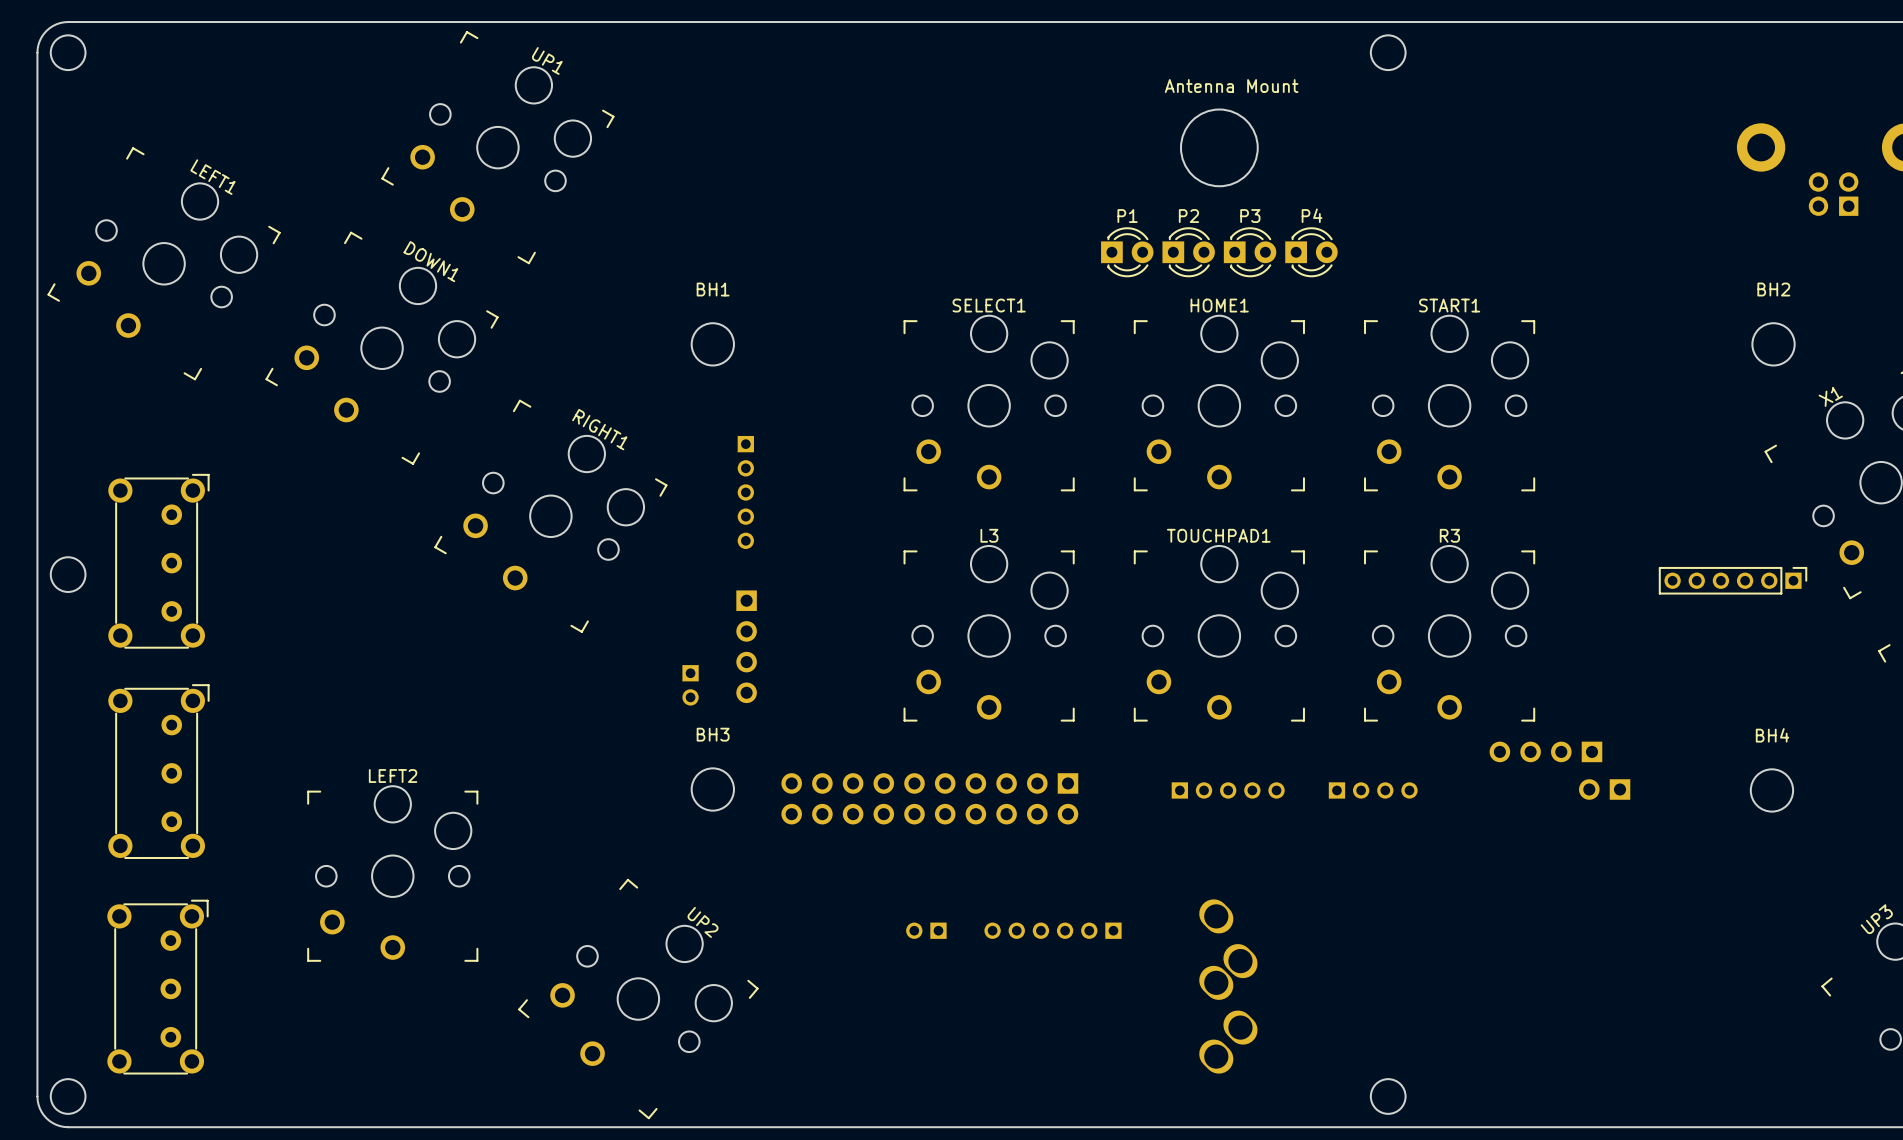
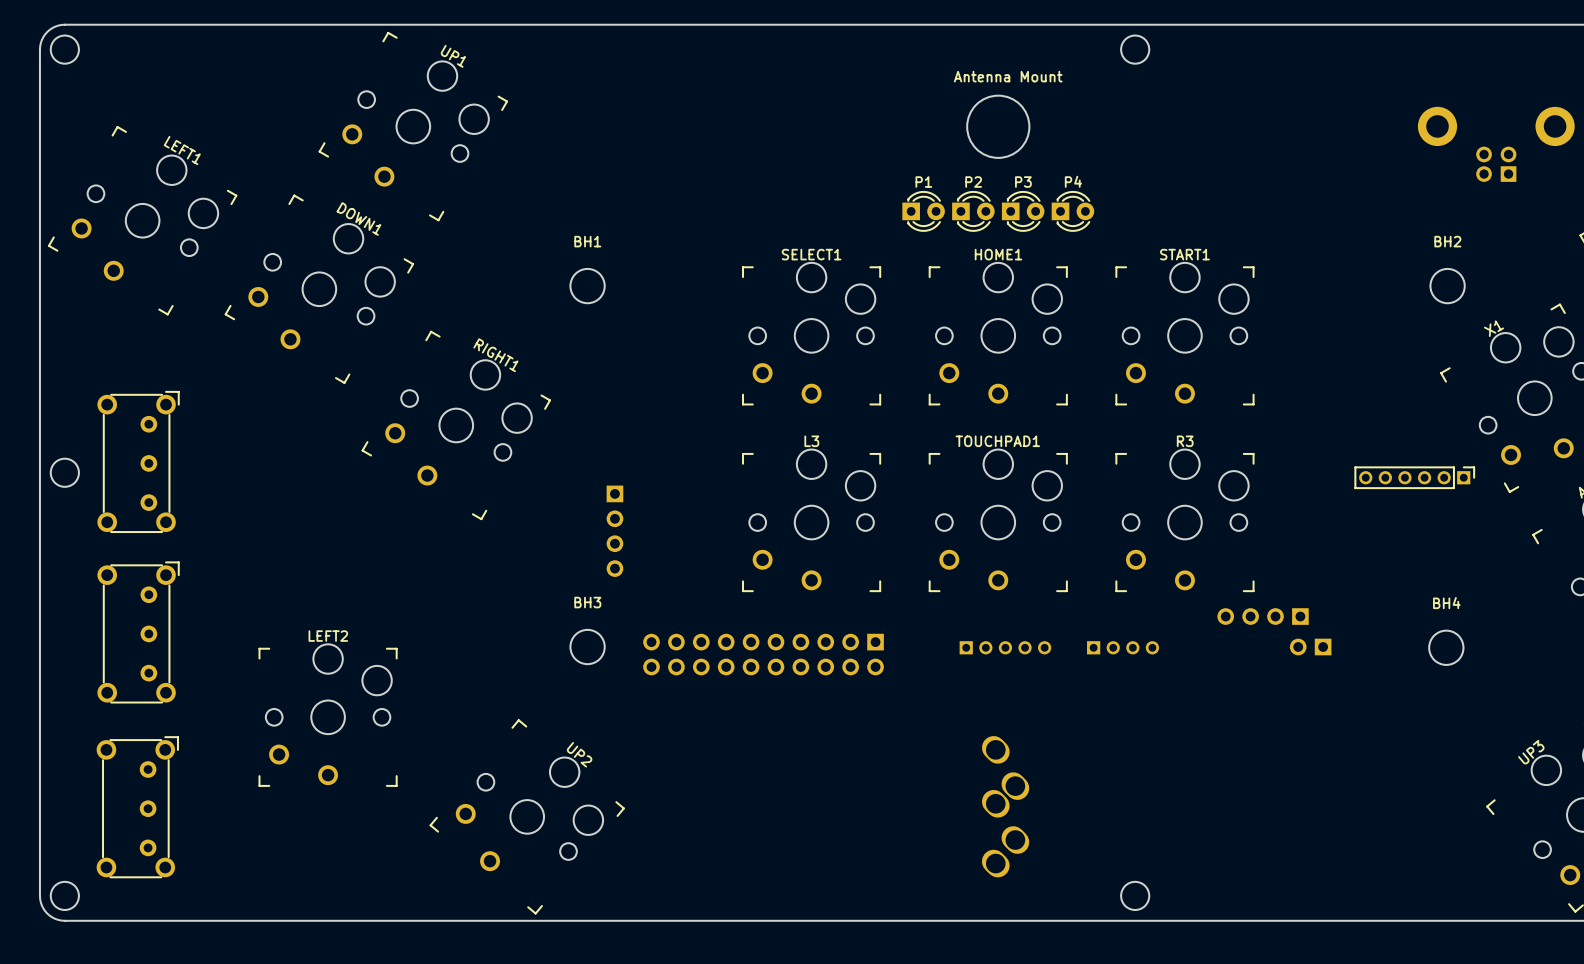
part: (745, 492) -> none
part: (690, 685) -> none
part: (926, 930) -> none
part: (1053, 930) -> none

